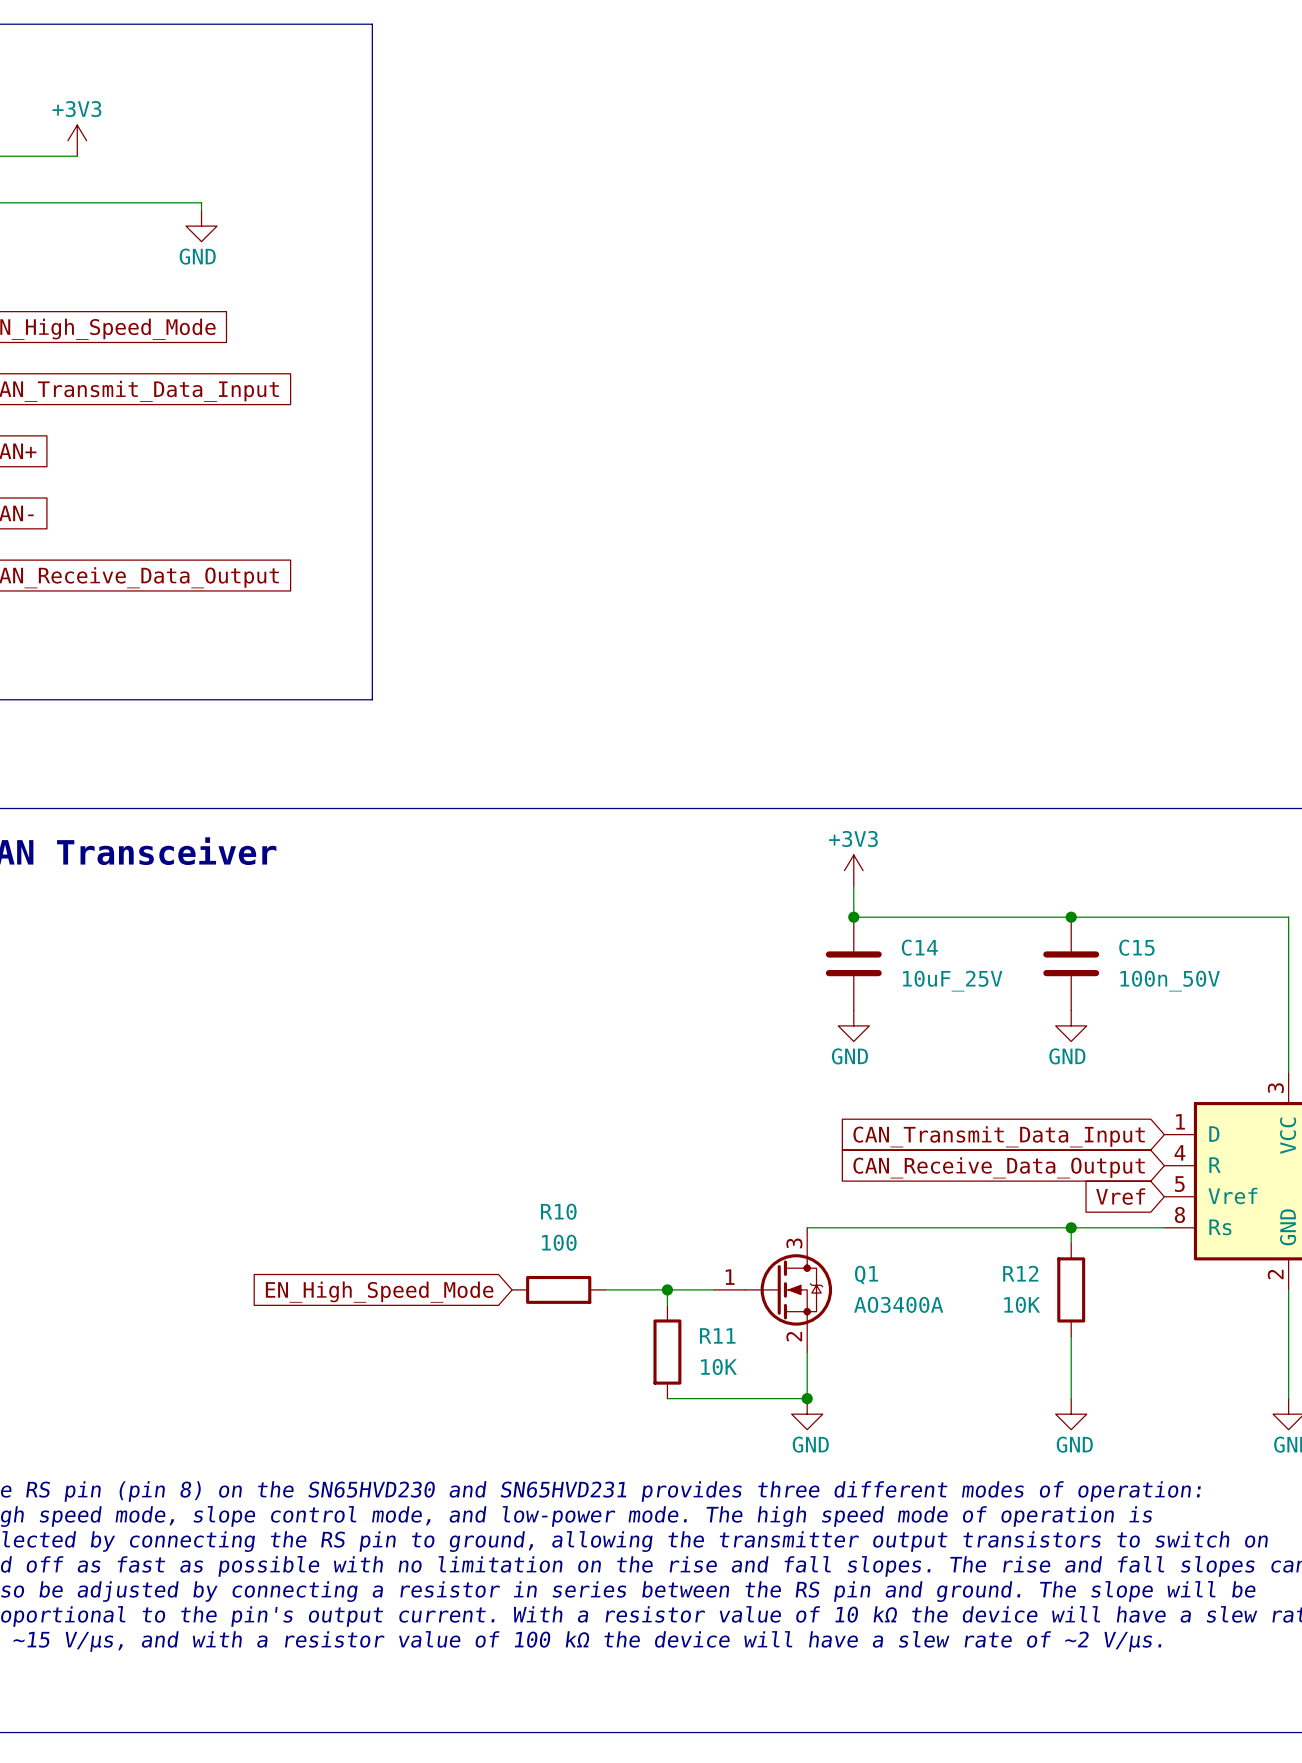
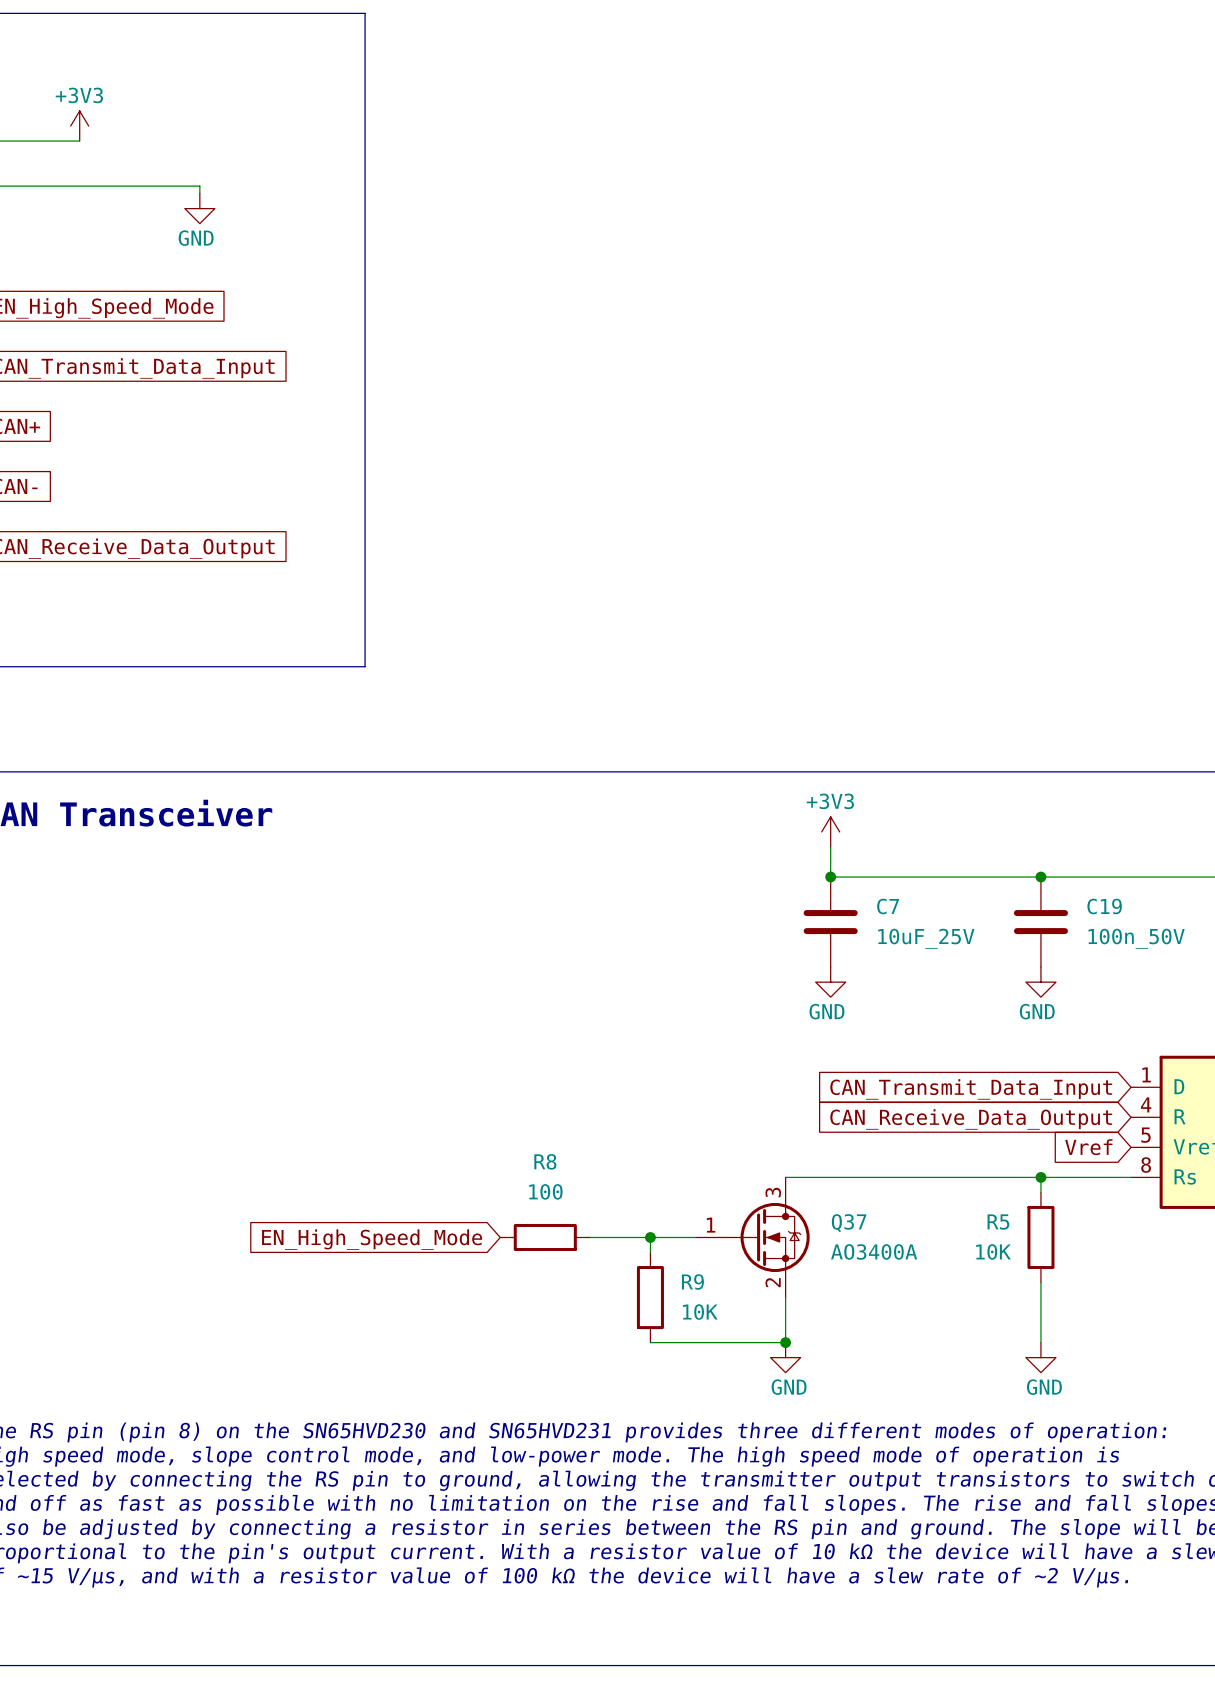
C14 name: C14 (919, 947) -> C7 (888, 906)
C15 name: C15 (1136, 947) -> C19 (1104, 906)
R10 name: R10 (558, 1211) -> R8 (545, 1161)
R12 name: R12 (1020, 1273) -> R5 (998, 1222)
Q1 name: Q1 (866, 1275) -> Q37 (849, 1223)
R11 name: R11 (717, 1335) -> R9 (692, 1281)

